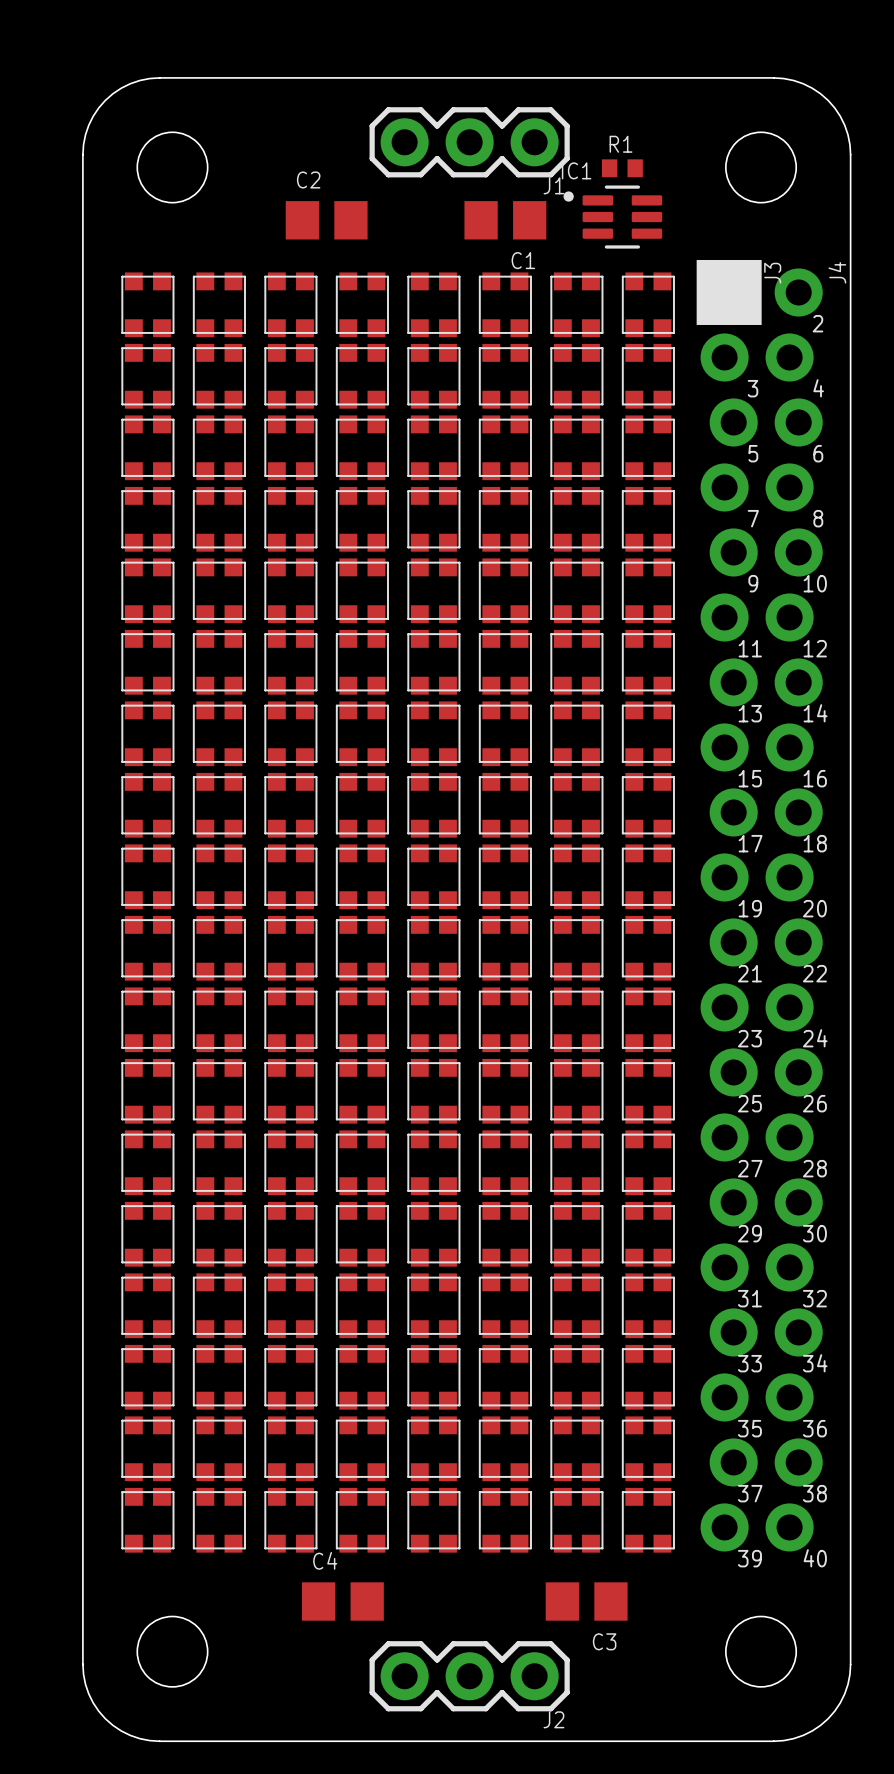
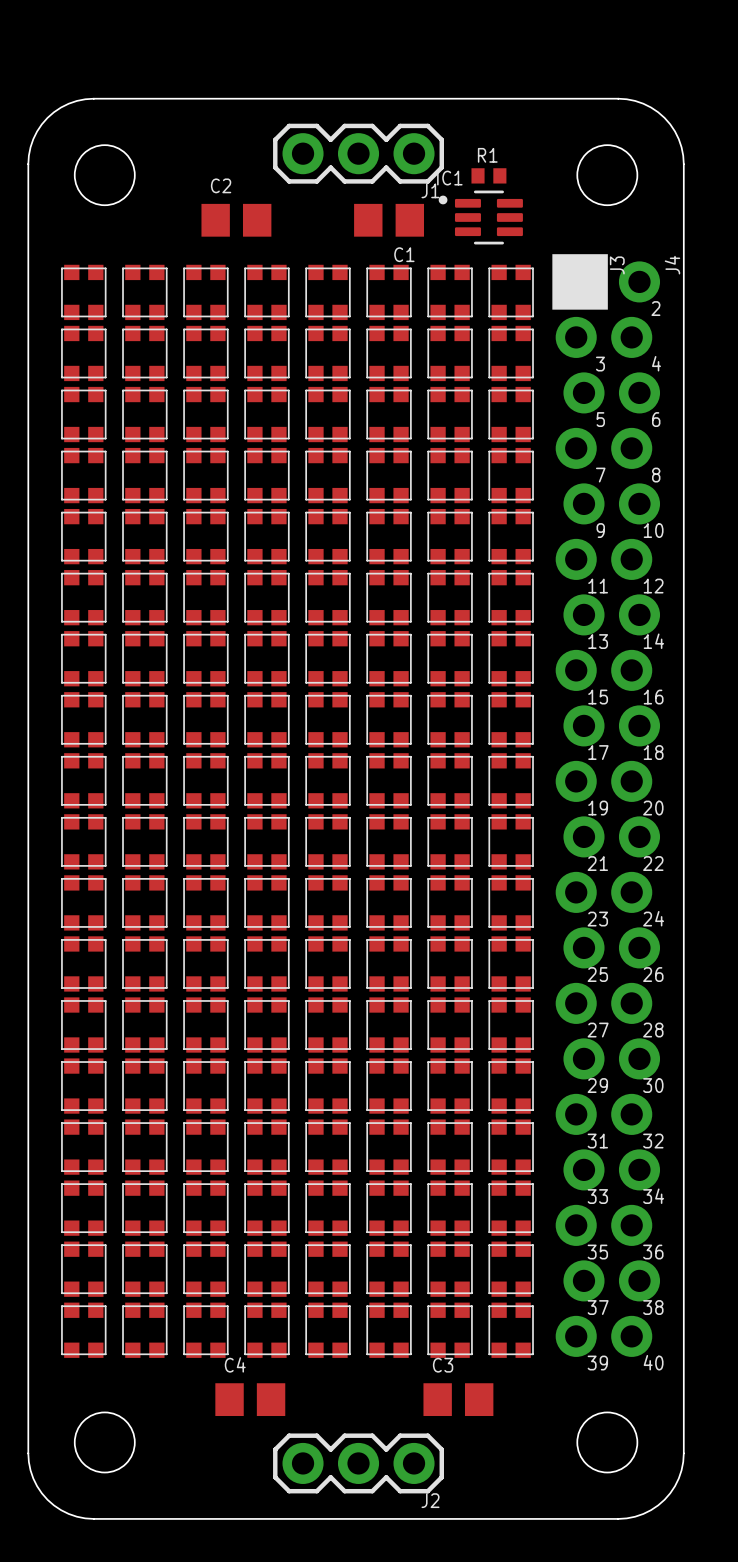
C3 name position: C3 (604, 1641) -> C3 (443, 1365)

